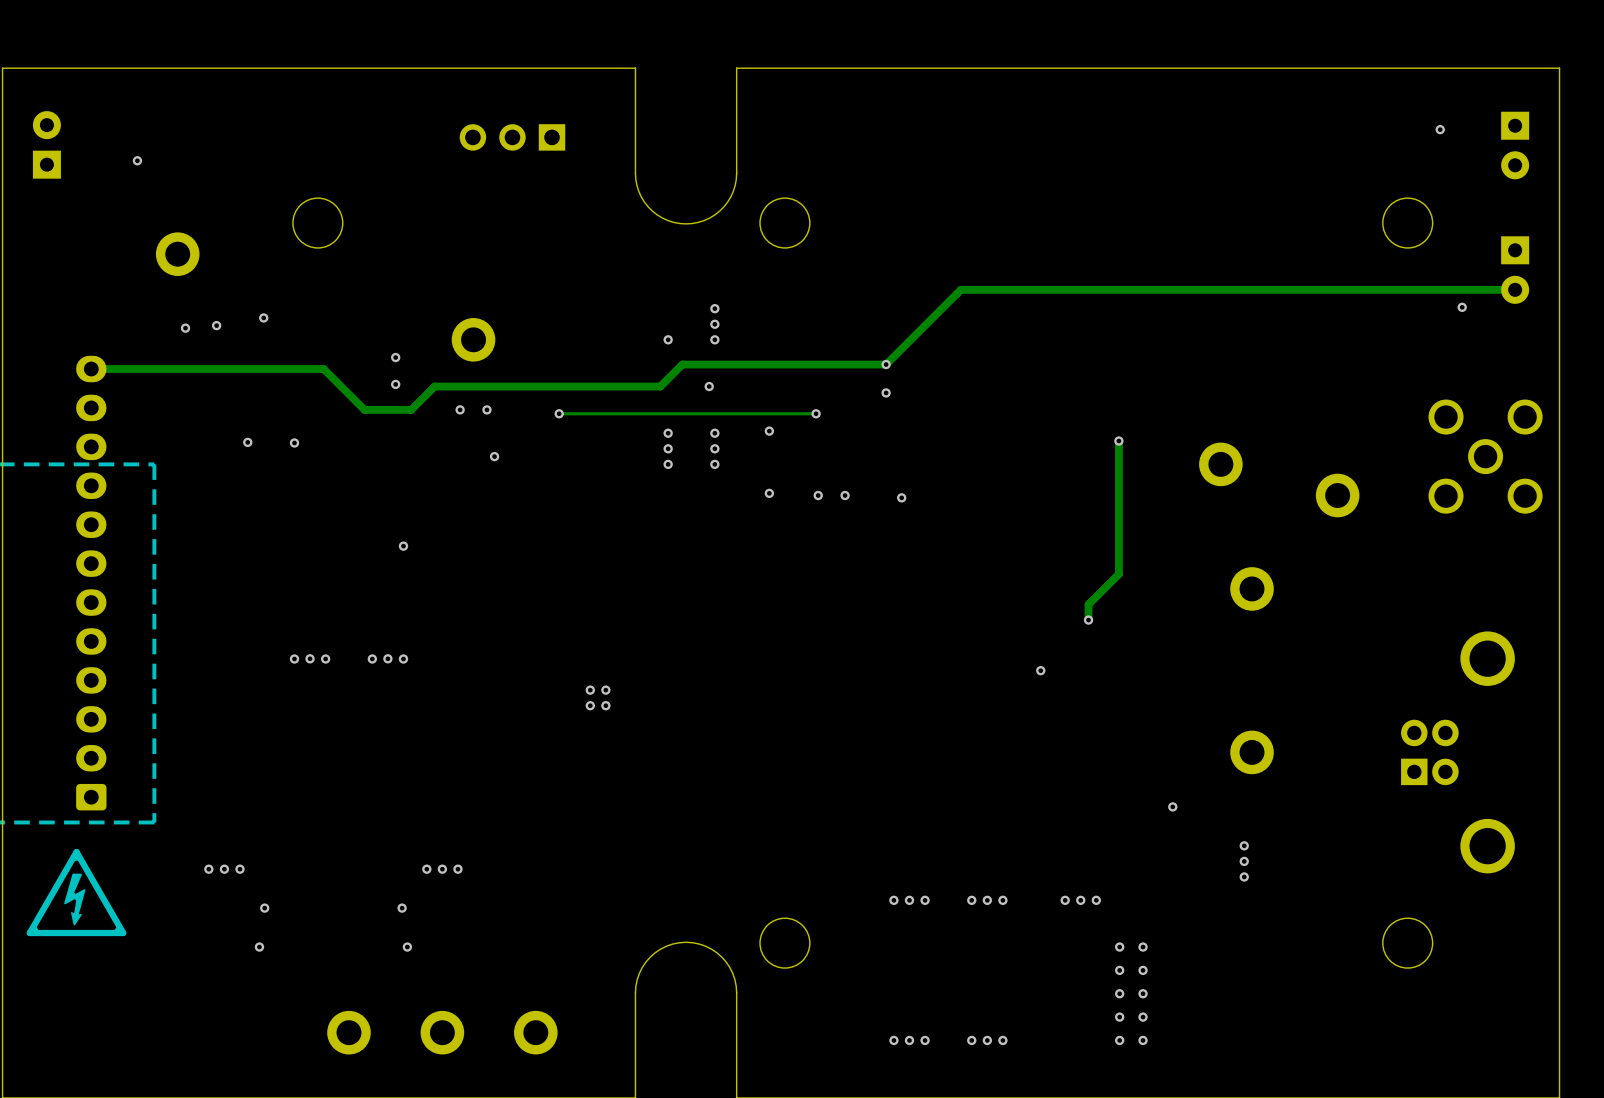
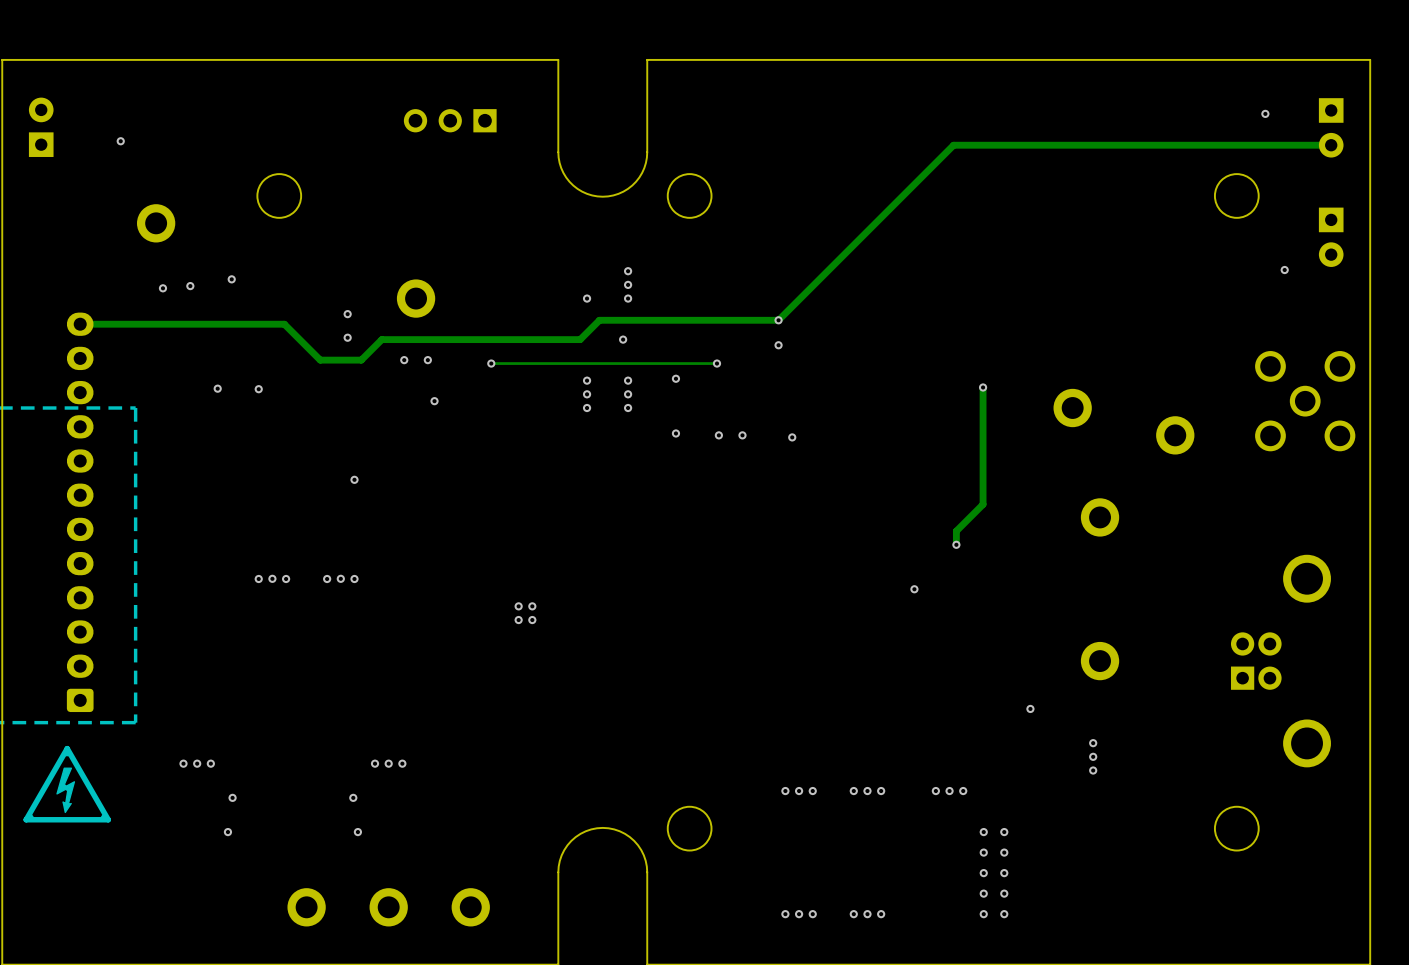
track: (1515, 289) (960, 289) -> (1331, 145) (953, 145) (844, 254)

